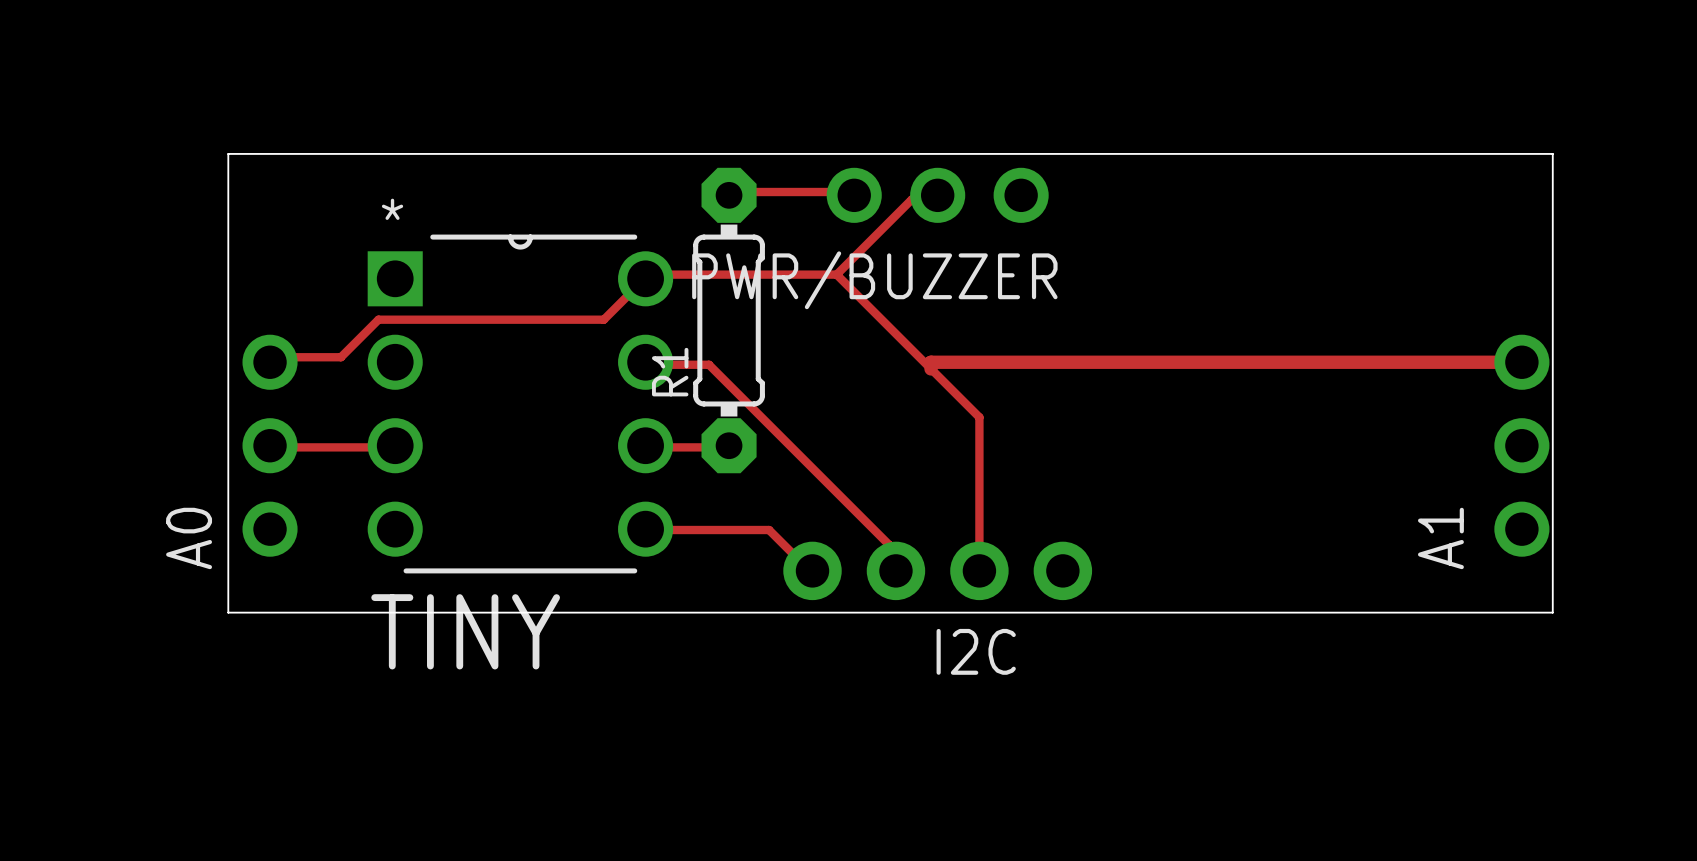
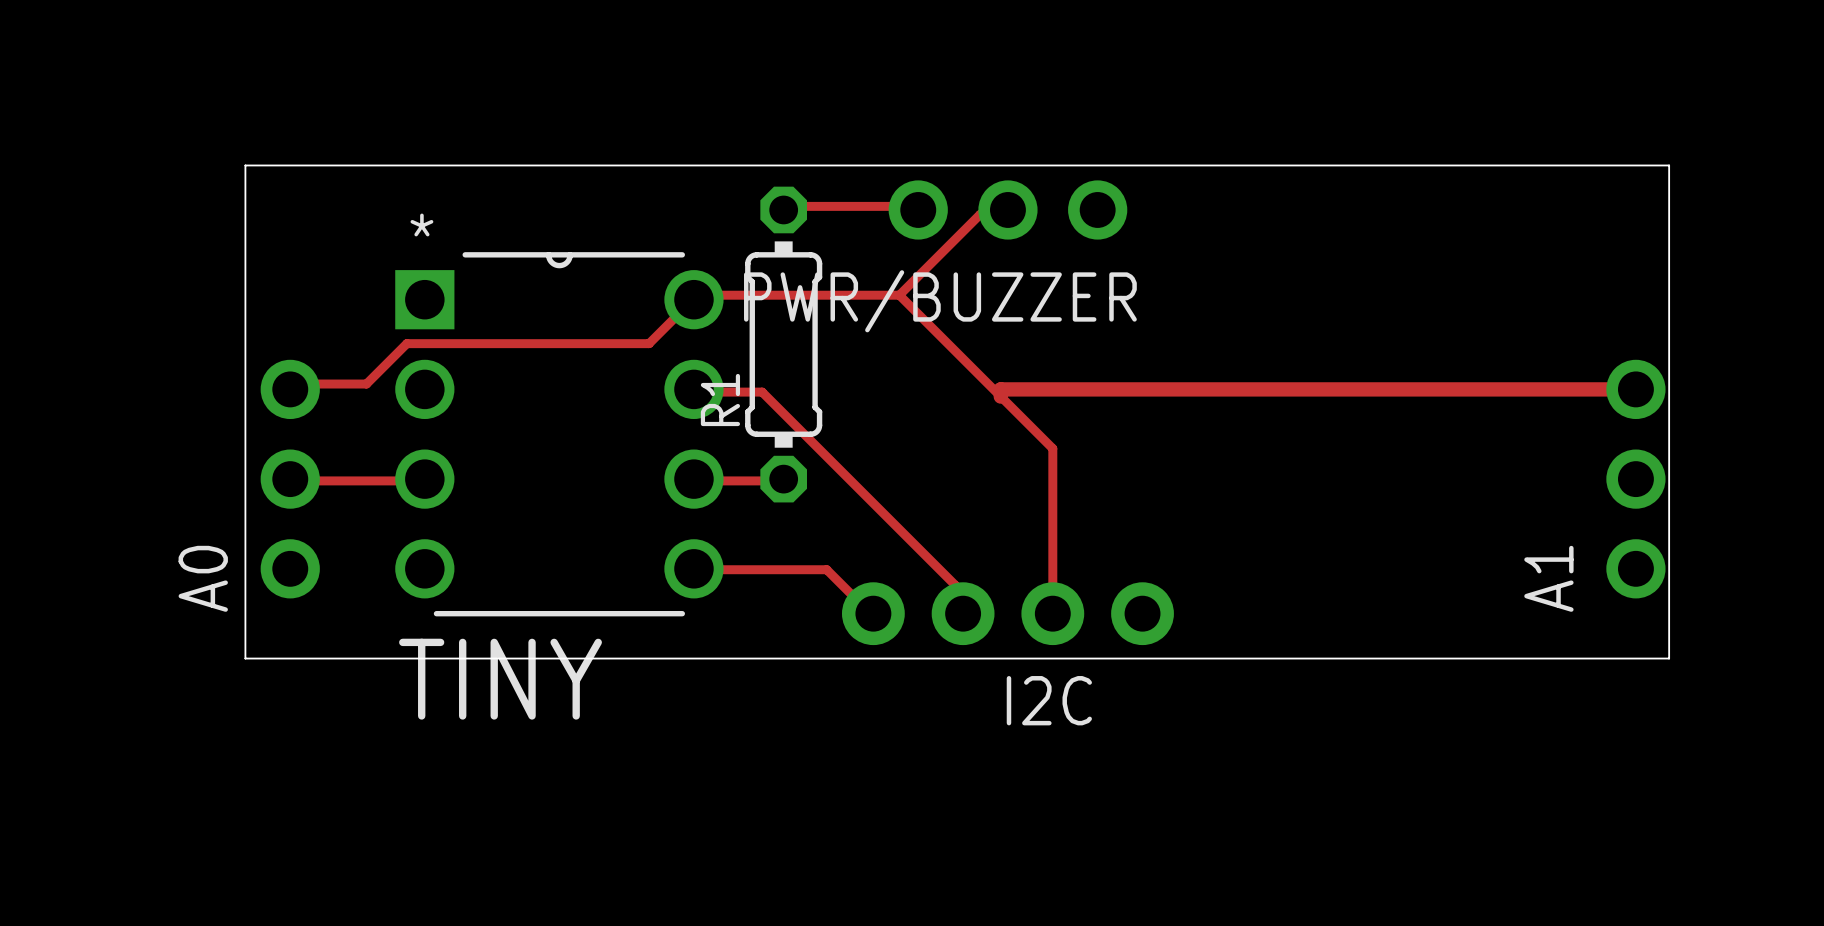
R1 footprint: [693, 167, 765, 474] -> [745, 186, 823, 503]

